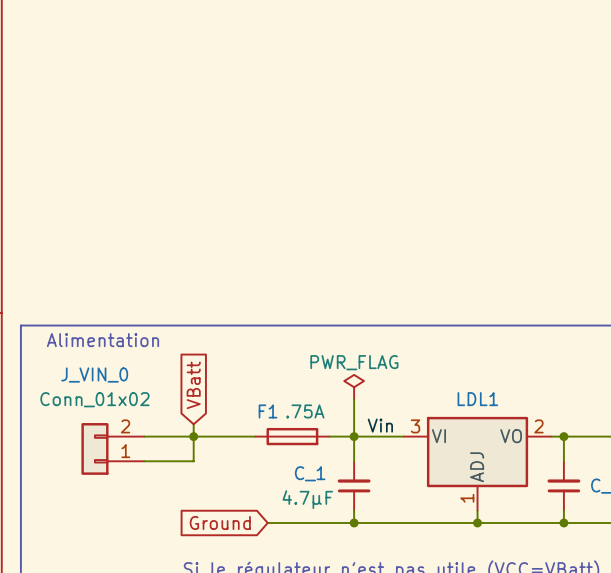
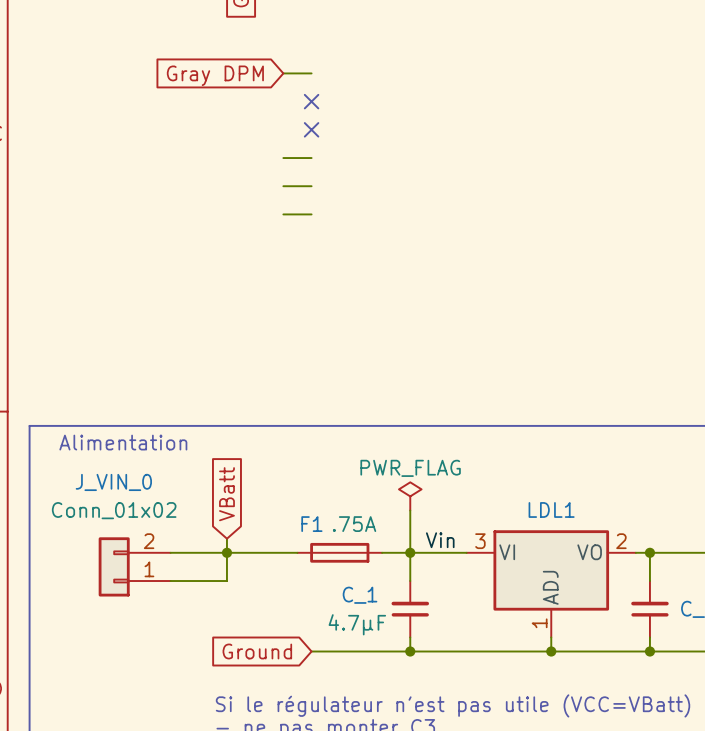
wire: none -> (283, 73) (311, 73)
global label: none -> Gray DPM (215, 75)
no-connect mark: none -> (311, 101)
no-connect mark: none -> (311, 129)
wire: none -> (283, 158) (311, 158)
wire: none -> (283, 186) (311, 186)
wire: none -> (283, 214) (311, 214)

